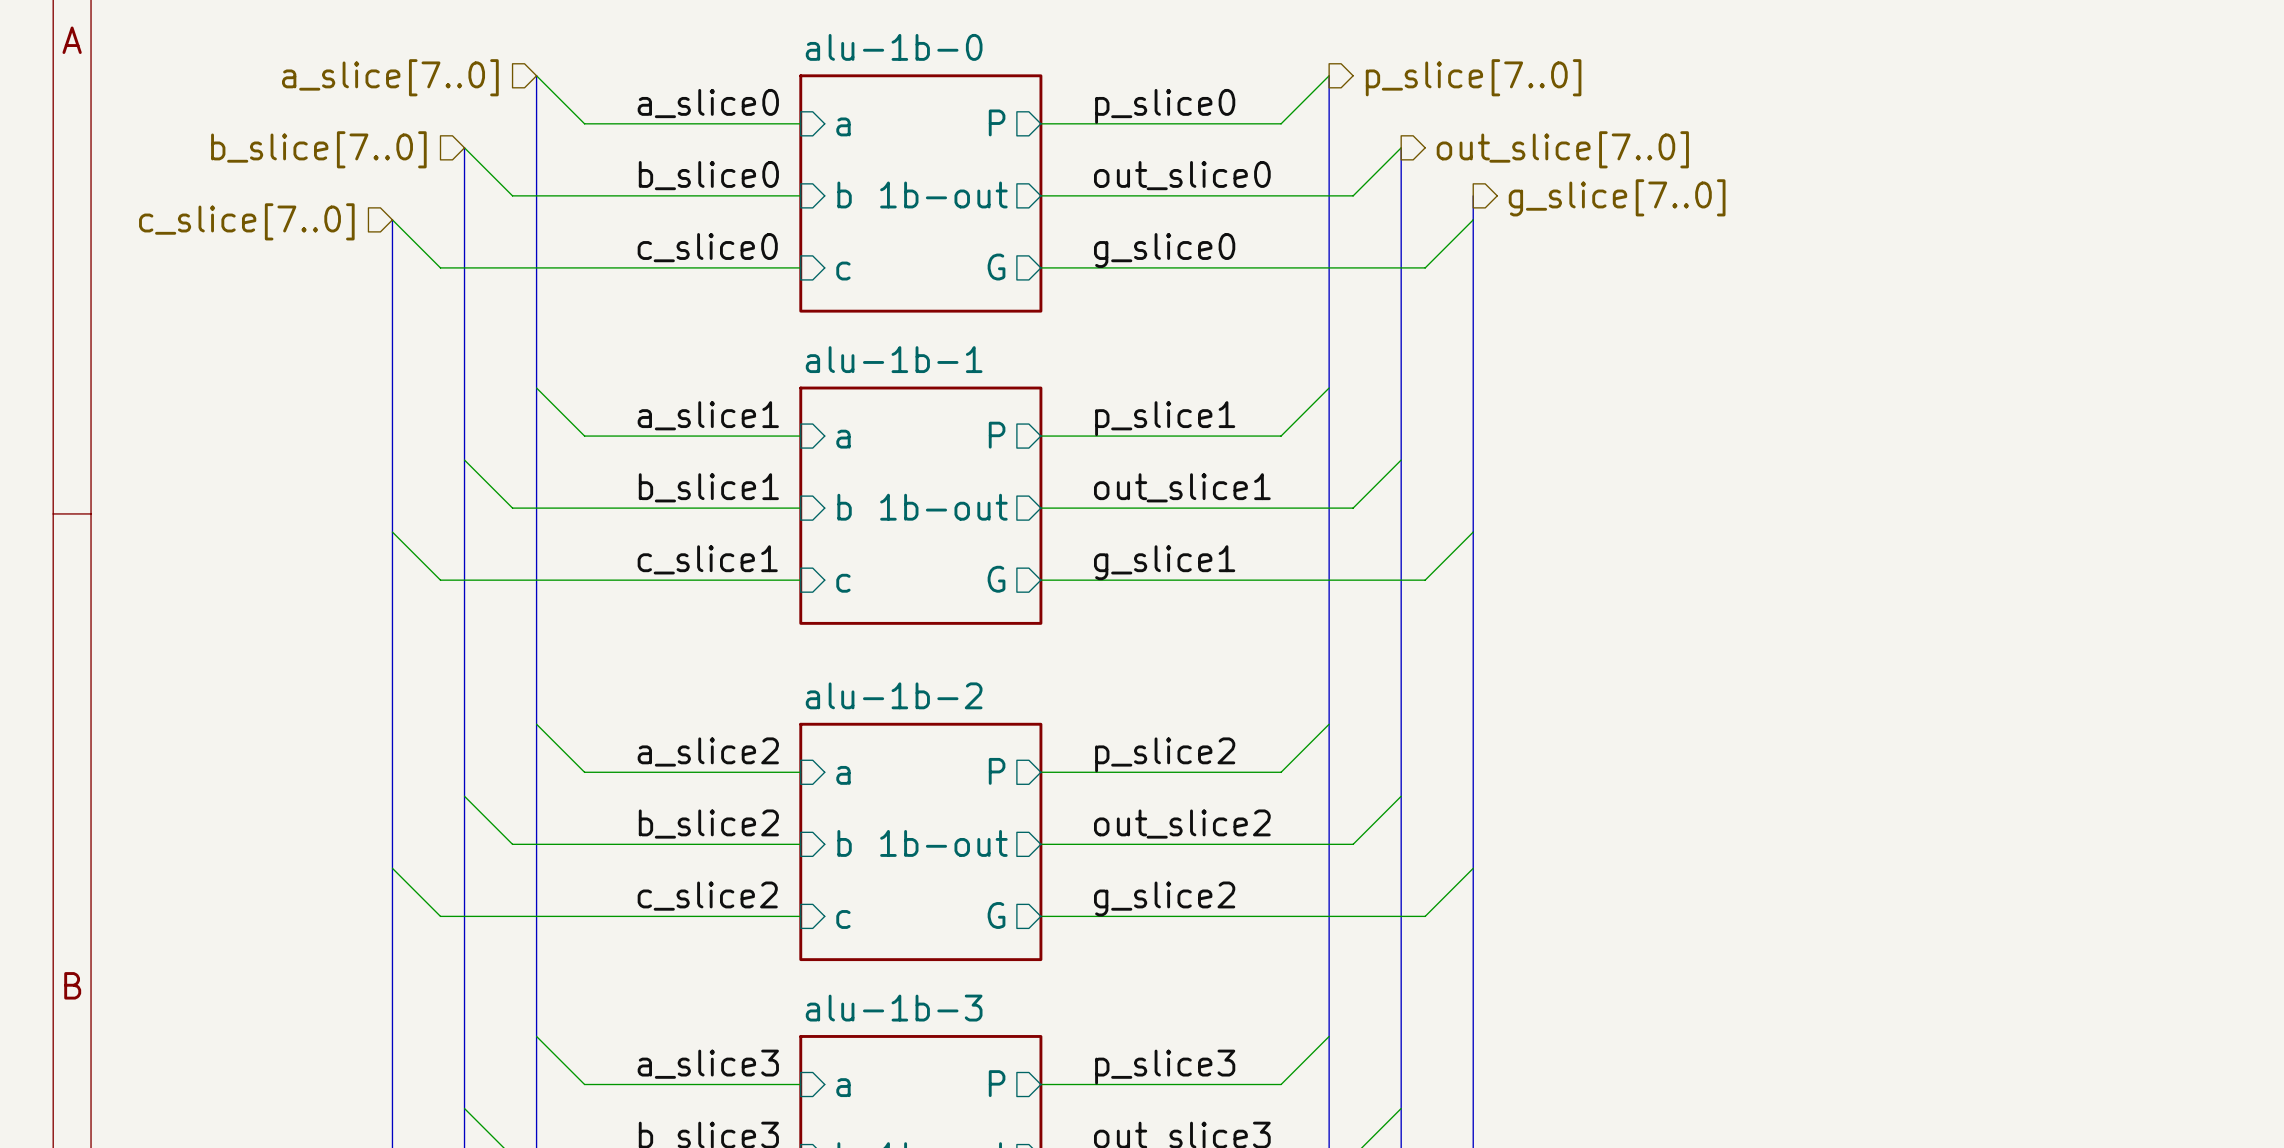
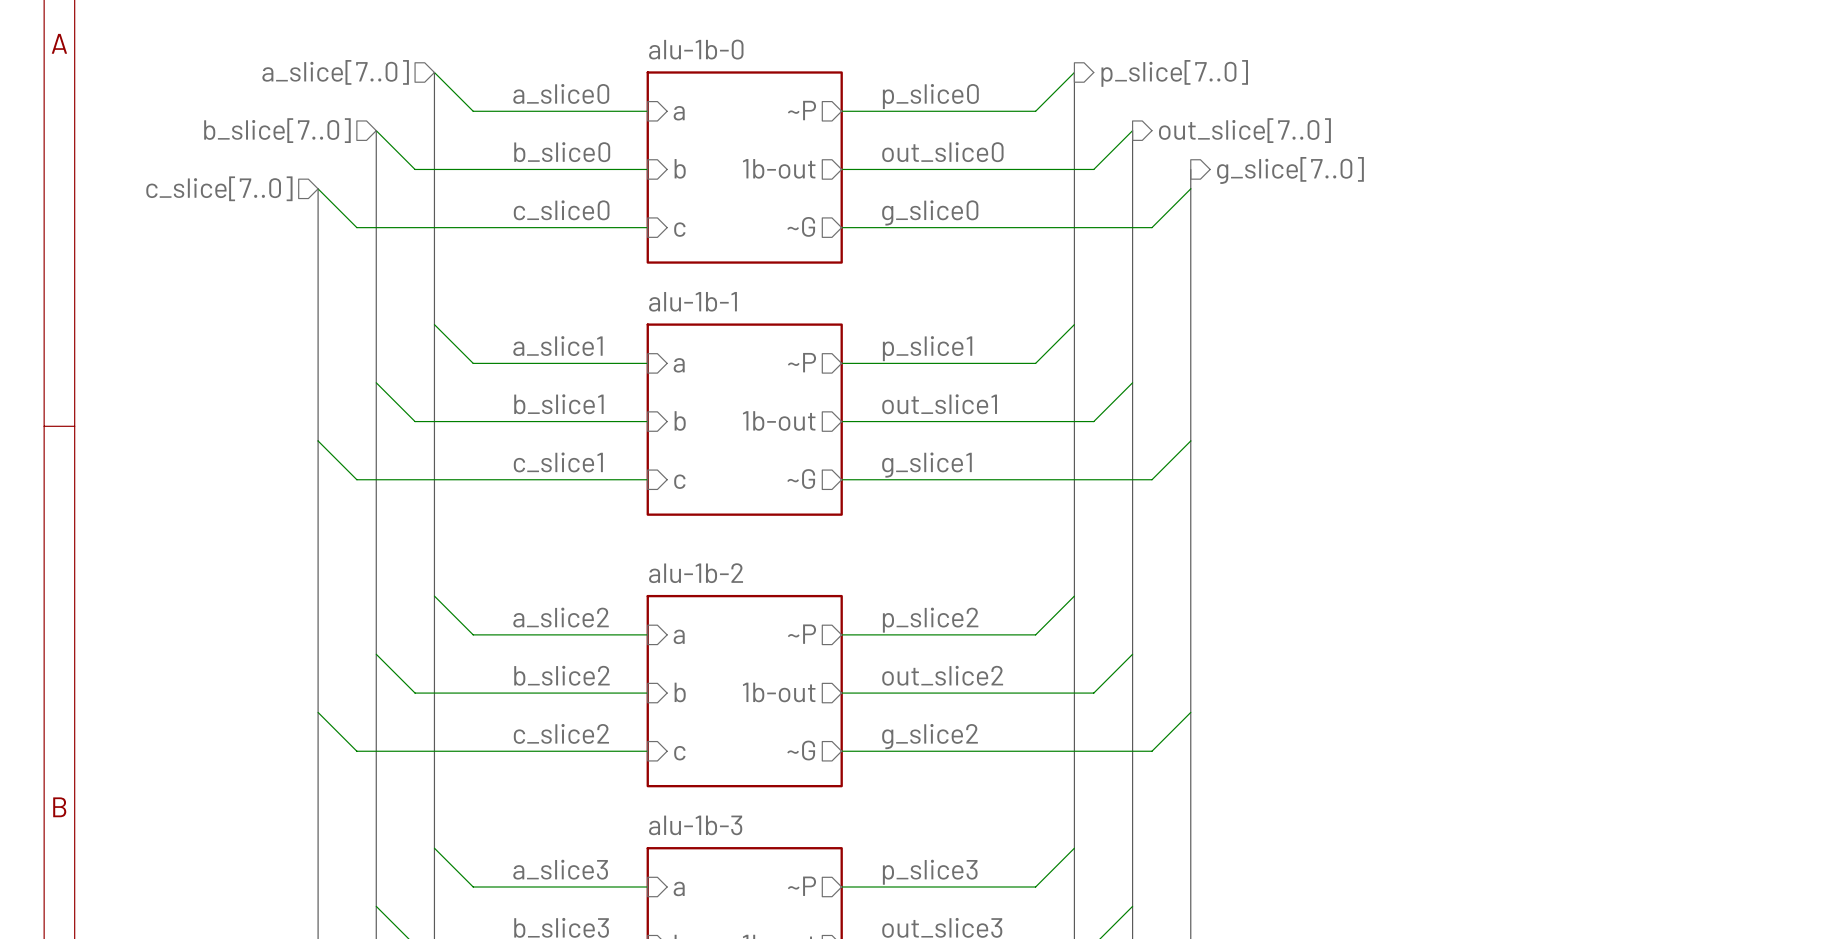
sheet pin: P (997, 122) -> ~P (801, 110)
sheet pin: G (996, 267) -> ~G (801, 226)
sheet pin: P (997, 435) -> ~P (801, 362)
sheet pin: G (996, 579) -> ~G (801, 479)
sheet pin: P (997, 771) -> ~P (801, 634)
sheet pin: G (996, 915) -> ~G (801, 750)
sheet pin: P (997, 1083) -> ~P (801, 886)

